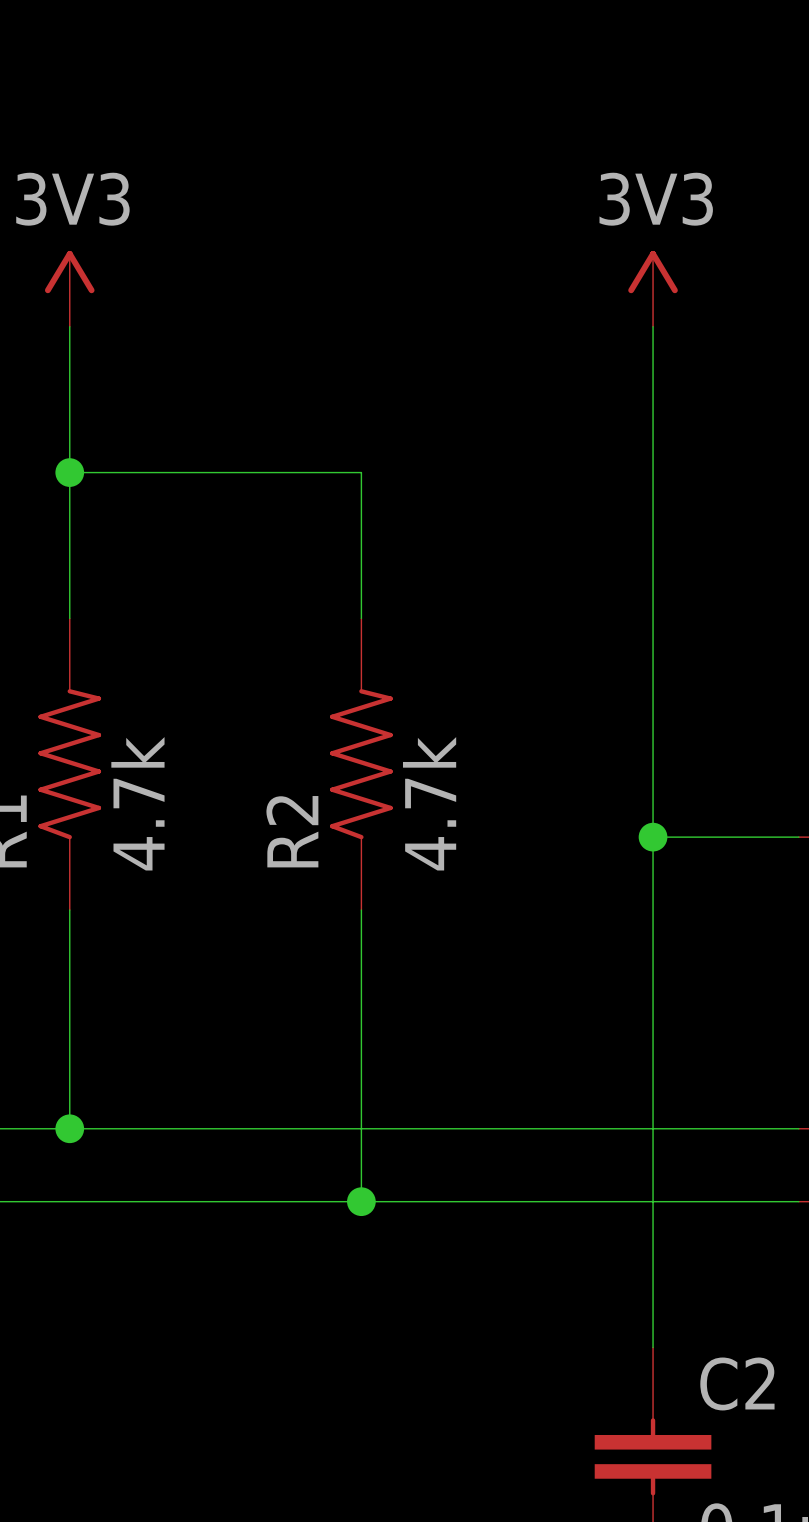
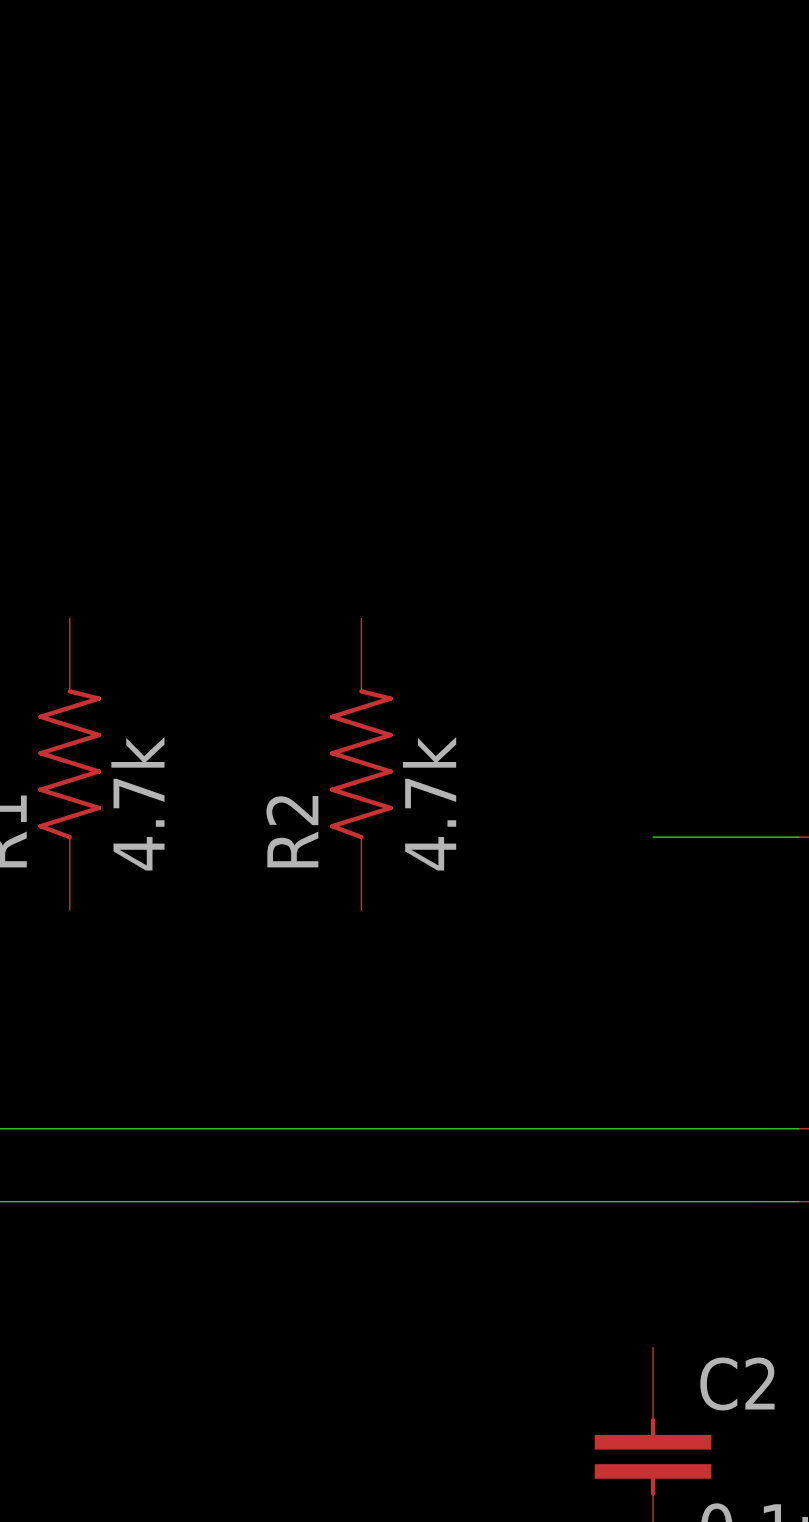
power symbol: 3V3 (69, 288) -> none
power symbol: 3V3 (653, 288) -> none
wire: (69, 326) (69, 618) -> none
wire: (653, 326) (653, 1347) -> none
wire: (69, 472) (361, 472) (361, 618) -> none
junction: (69, 472) -> none
junction: (653, 837) -> none
wire: (69, 910) (69, 1128) -> none
wire: (361, 910) (361, 1201) -> none
junction: (69, 1128) -> none
junction: (361, 1201) -> none

